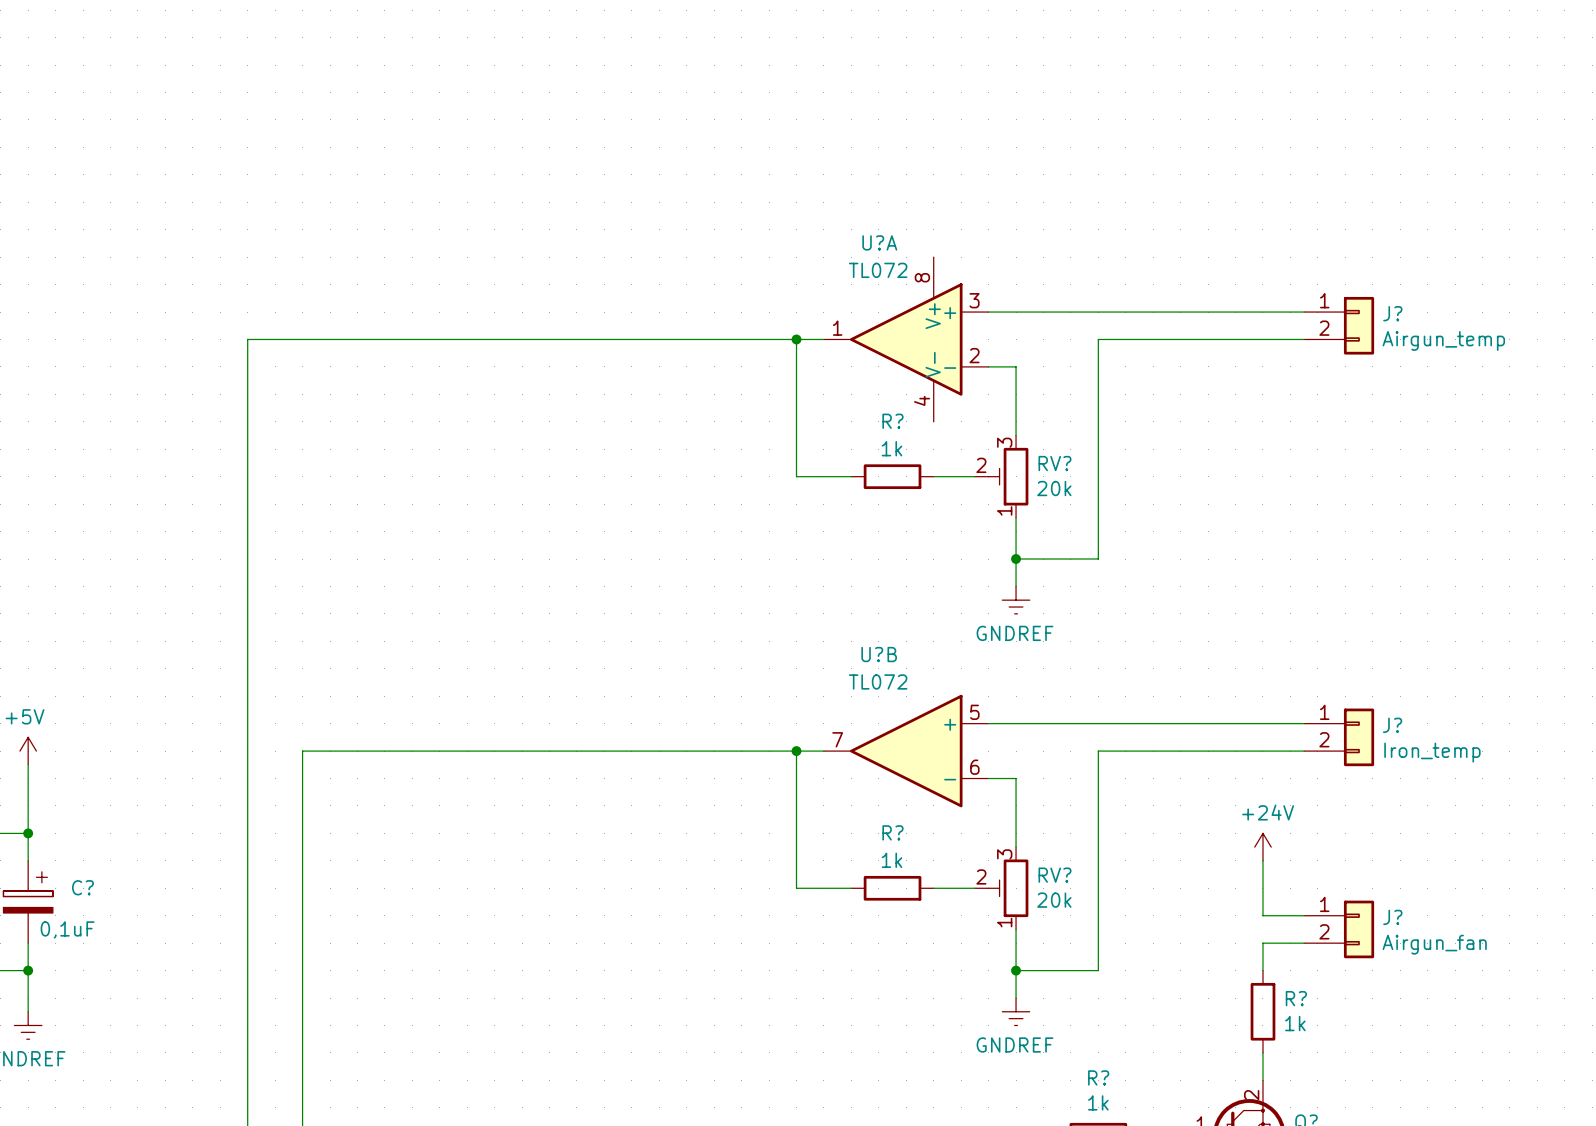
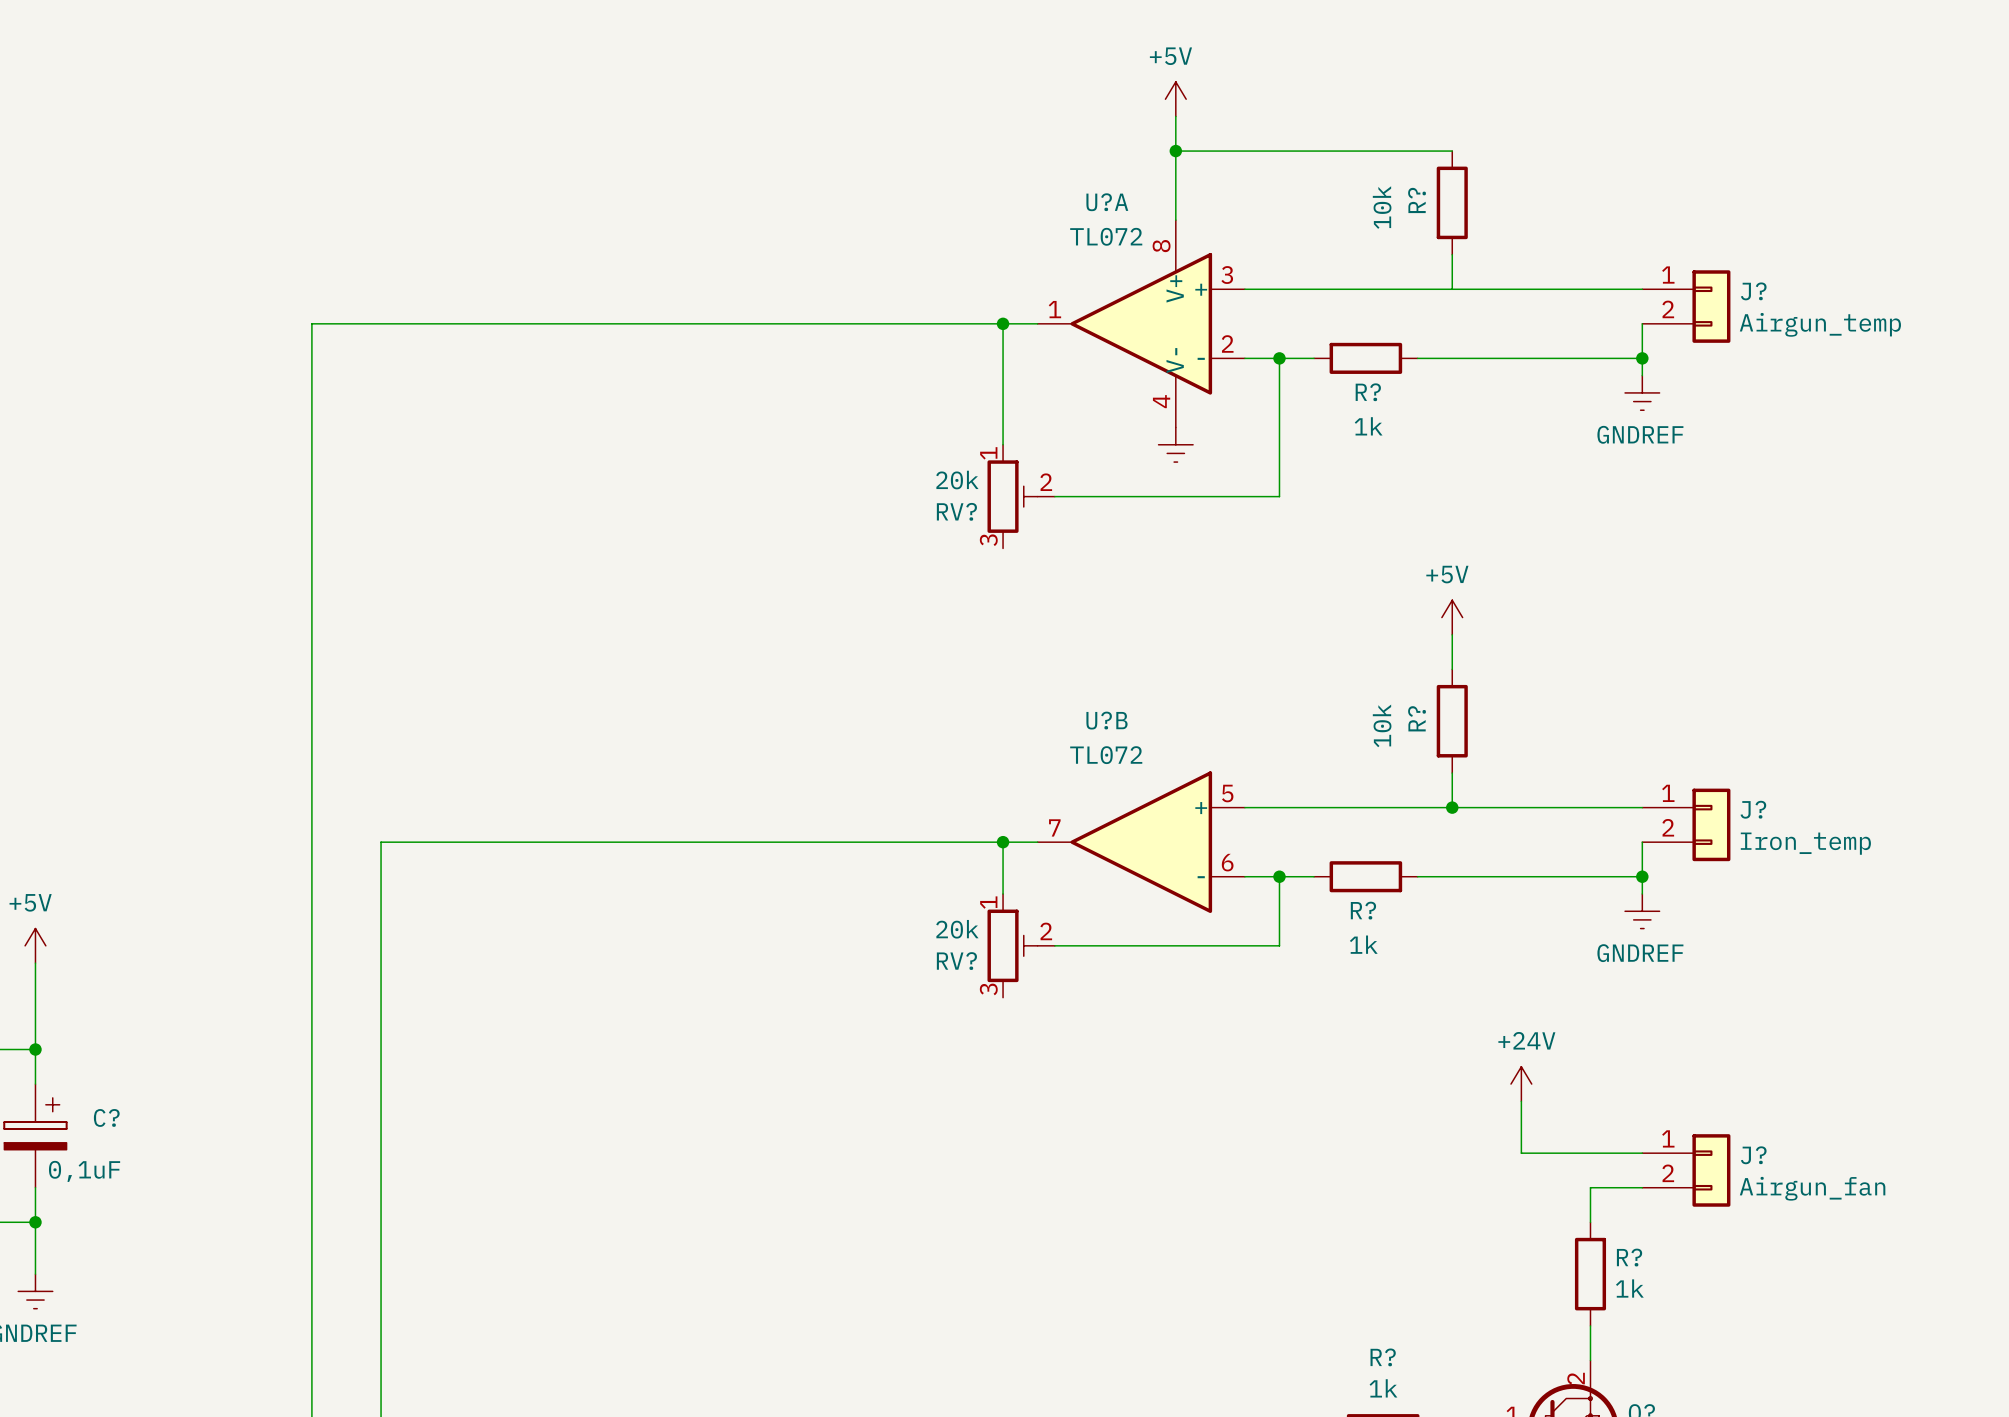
power symbol: none -> +5V (1175, 99)
wire: none -> (1175, 116) (1175, 220)
wire: none -> (1175, 151) (1452, 151)
junction: none -> (1175, 151)
R?: none -> 10k (1452, 202)
wire: none -> (1452, 254) (1452, 289)
wire: none -> (1003, 323) (1003, 427)
junction: none -> (1003, 323)
wire: none -> (1642, 323) (1642, 375)
wire: none -> (1244, 358) (1314, 358)
junction: none -> (1279, 358)
R?: none -> 1k (1365, 358)
wire: none -> (1417, 358) (1642, 358)
junction: none -> (1642, 358)
wire: (988, 312) (1304, 312) -> (1244, 289) (1642, 289)
power symbol: none -> GNDREF (1642, 392)
J? position: (1339, 325) -> (1686, 306)
wire: (247, 339) (823, 339) -> (311, 427) (311, 323) (1037, 323)
junction: (796, 339) -> none
U?A position: (906, 339) -> (1141, 323)
part position: (933, 339) -> (1175, 323)
wire: (1304, 339) (1098, 339) (1098, 559) (1016, 559) -> none
wire: (796, 353) (796, 476) (851, 476) -> none
power symbol: none -> (1175, 444)
wire: (988, 366) (1016, 366) -> (1279, 358) (1279, 462)
RV?: none -> 20k (1021, 496)
wire: (1016, 394) (1016, 435) -> (1279, 496) (1054, 496)
R?: 1k (892, 476) -> none
wire: (933, 476) (974, 476) -> none
RV?: 20k (1001, 476) -> none
power symbol: none -> +5V (1452, 617)
wire: none -> (1452, 634) (1452, 669)
wire: (1016, 517) (1016, 586) -> none
junction: (1016, 559) -> none
R?: none -> 10k (1452, 721)
power symbol: GNDREF (1016, 600) -> none
wire: none -> (1452, 773) (1452, 807)
junction: none -> (1452, 807)
wire: none -> (1003, 842) (1003, 894)
junction: none -> (1003, 842)
wire: none -> (1642, 842) (1642, 894)
wire: none -> (1244, 876) (1314, 876)
wire: none -> (1279, 876) (1279, 945) (1054, 945)
junction: none -> (1279, 876)
R?: none -> 1k (1365, 876)
wire: none -> (1417, 876) (1642, 876)
junction: none -> (1642, 876)
wire: (988, 723) (1304, 723) -> (1244, 807) (1642, 807)
power symbol: none -> GNDREF (1642, 911)
J? position: (1339, 737) -> (1686, 824)
wire: (302, 751) (823, 751) -> (381, 945) (381, 842) (1037, 842)
wire: (796, 751) (796, 888) (851, 888) -> none
junction: (796, 751) -> none
RV?: none -> 20k (1021, 945)
U?B position: (906, 751) -> (1141, 842)
wire: (1304, 751) (1098, 751) (1098, 970) (1016, 970) -> none
wire: (988, 778) (1016, 778) (1016, 847) -> none
power symbol position: +24V (1262, 847) -> +24V (1521, 1084)
wire: (1262, 860) (1262, 915) -> (1521, 1101) (1521, 1153) (1590, 1153)
R?: 1k (892, 888) -> none
wire: (933, 888) (974, 888) -> none
RV?: 20k (1001, 888) -> none
wire: (1016, 929) (1016, 998) -> none
junction: (1016, 970) -> none
power symbol: GNDREF (1016, 1011) -> none

